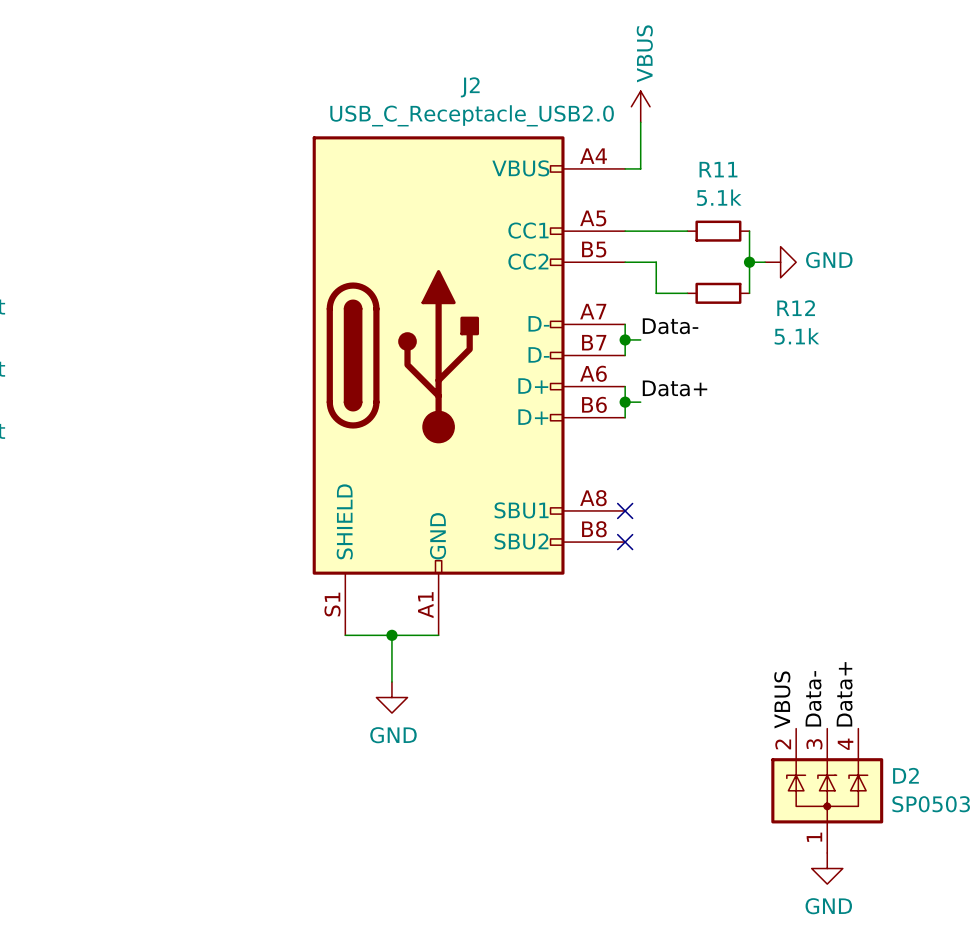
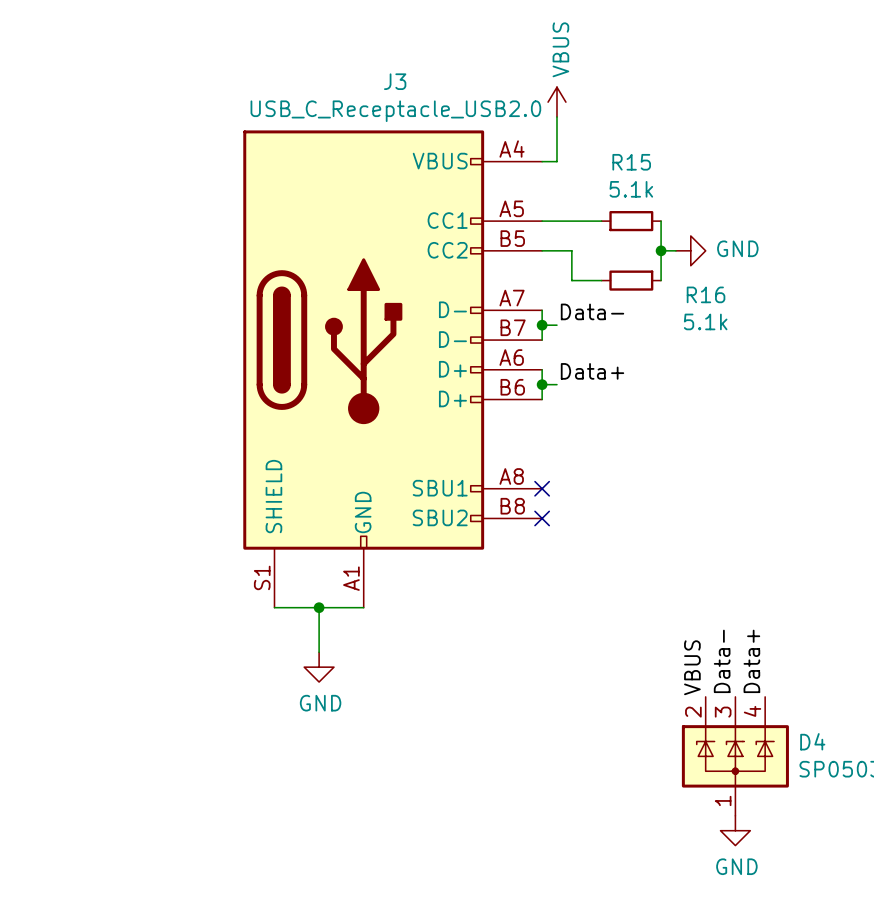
J2 name: J2 (470, 87) -> J3 (395, 81)
R11 name: R11 (718, 169) -> R15 (631, 162)
R12 name: R12 (796, 308) -> R16 (706, 294)
D2 name: D2 (905, 775) -> D4 (812, 741)

